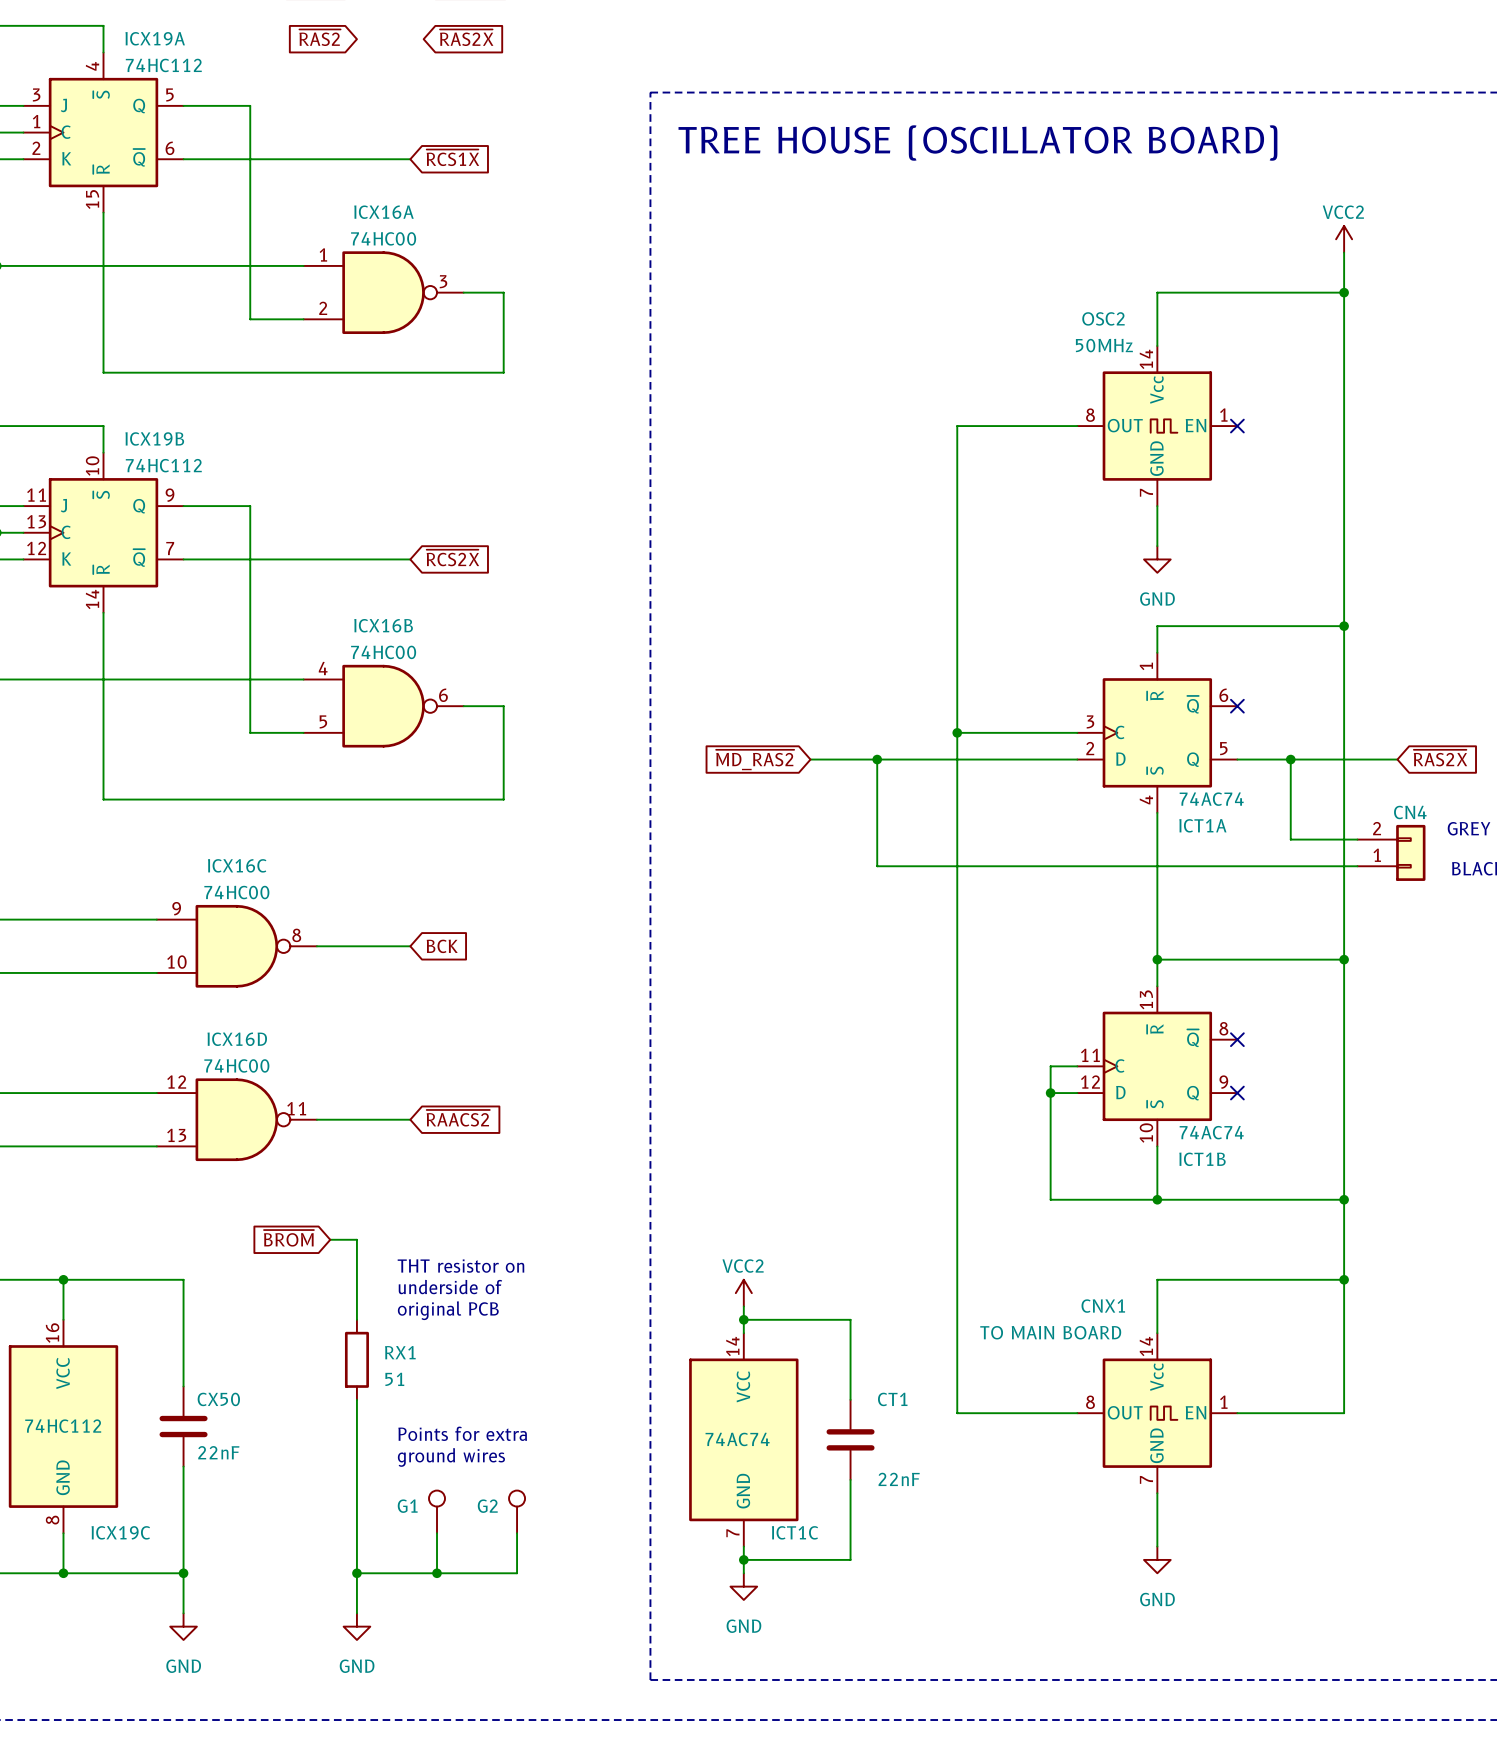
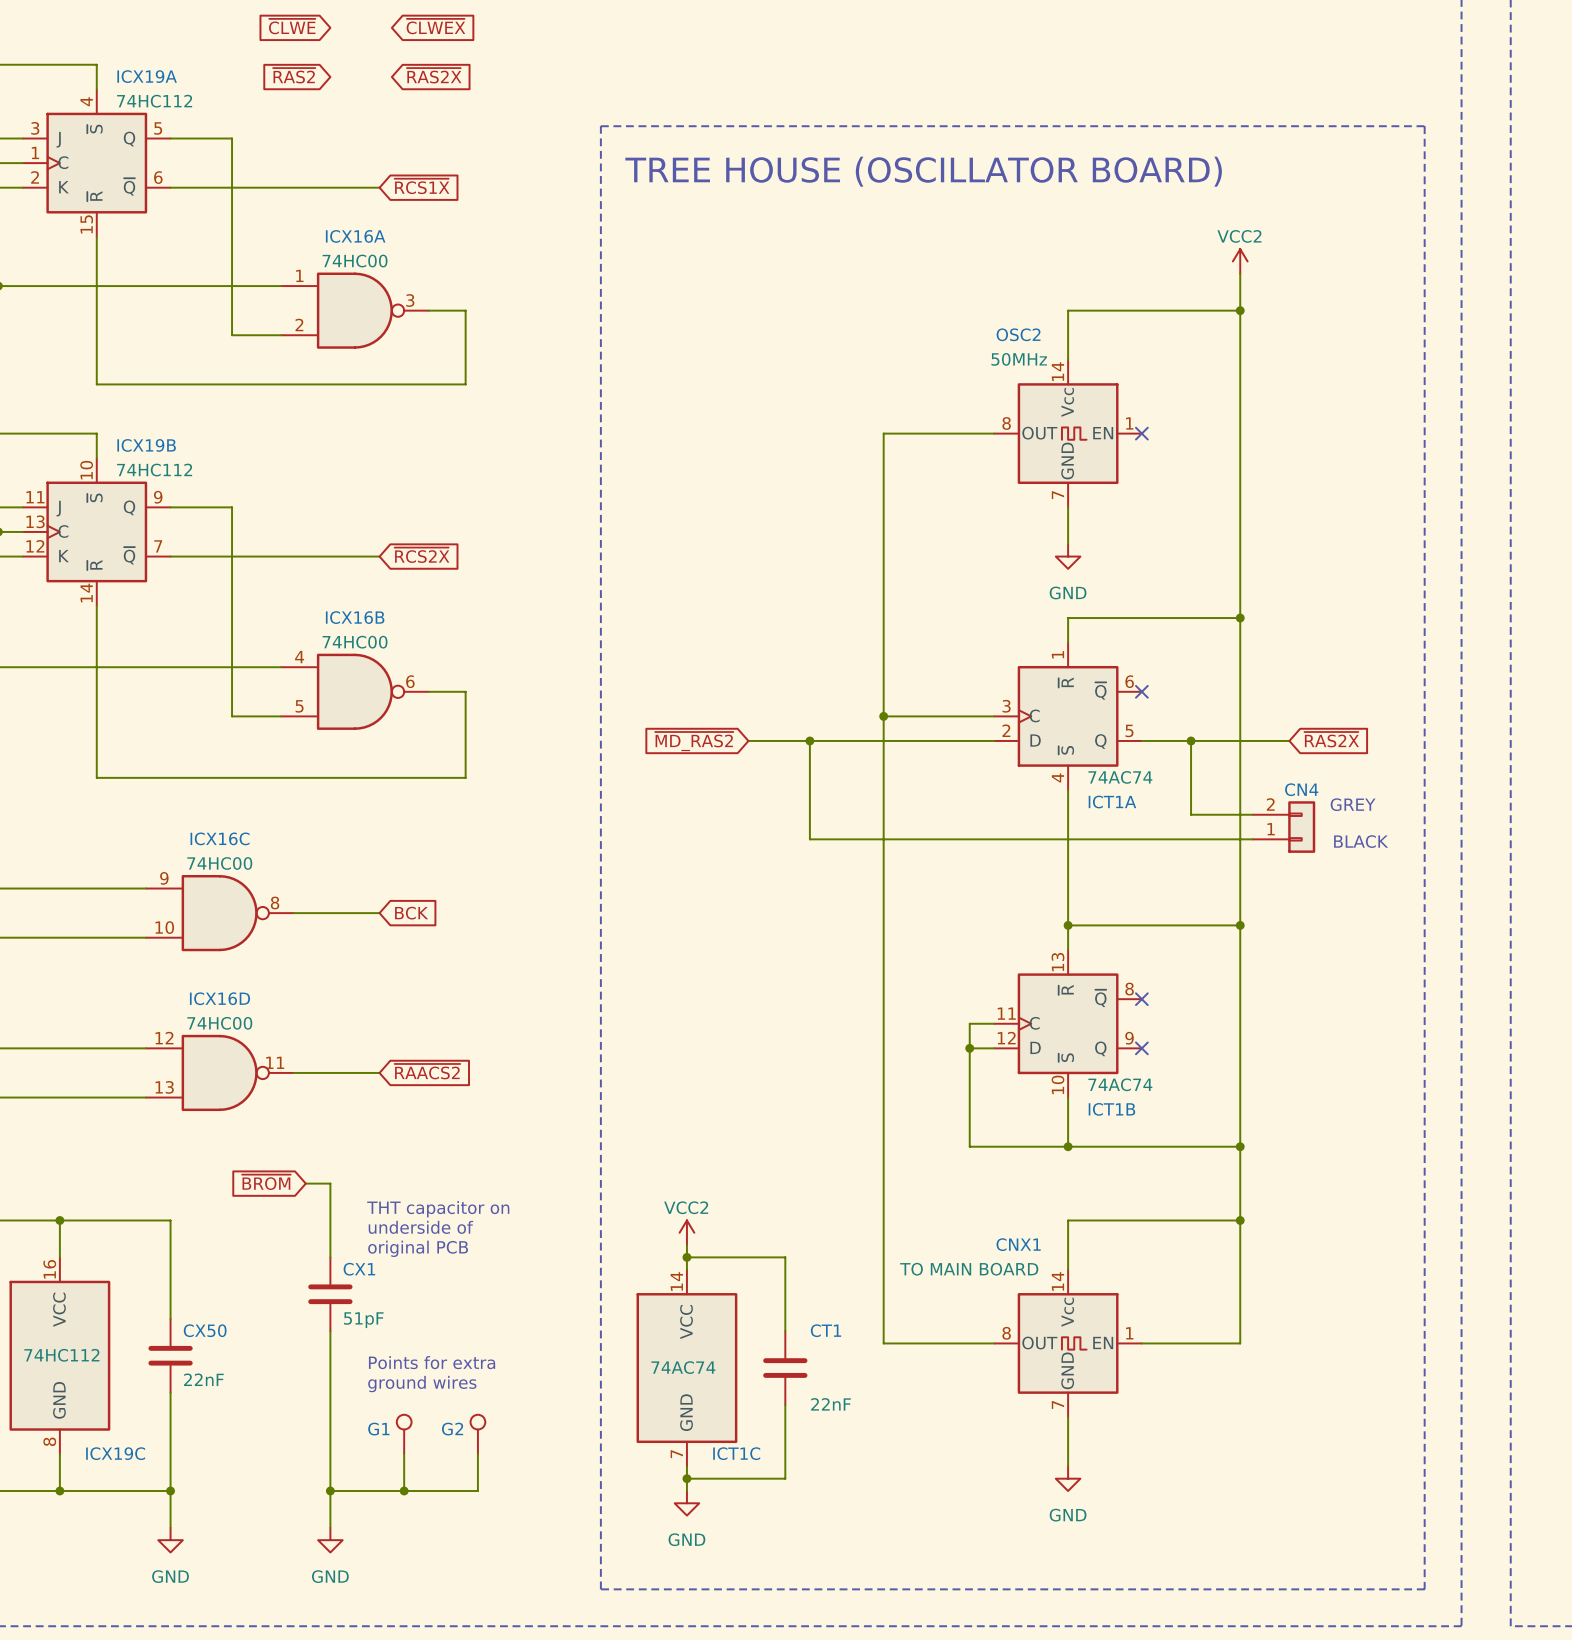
text: THT resistor on (460, 1266) -> THT capacitor on (438, 1209)
RX1: 51 (356, 1359) -> none
CX1: none -> 51pF (330, 1294)

